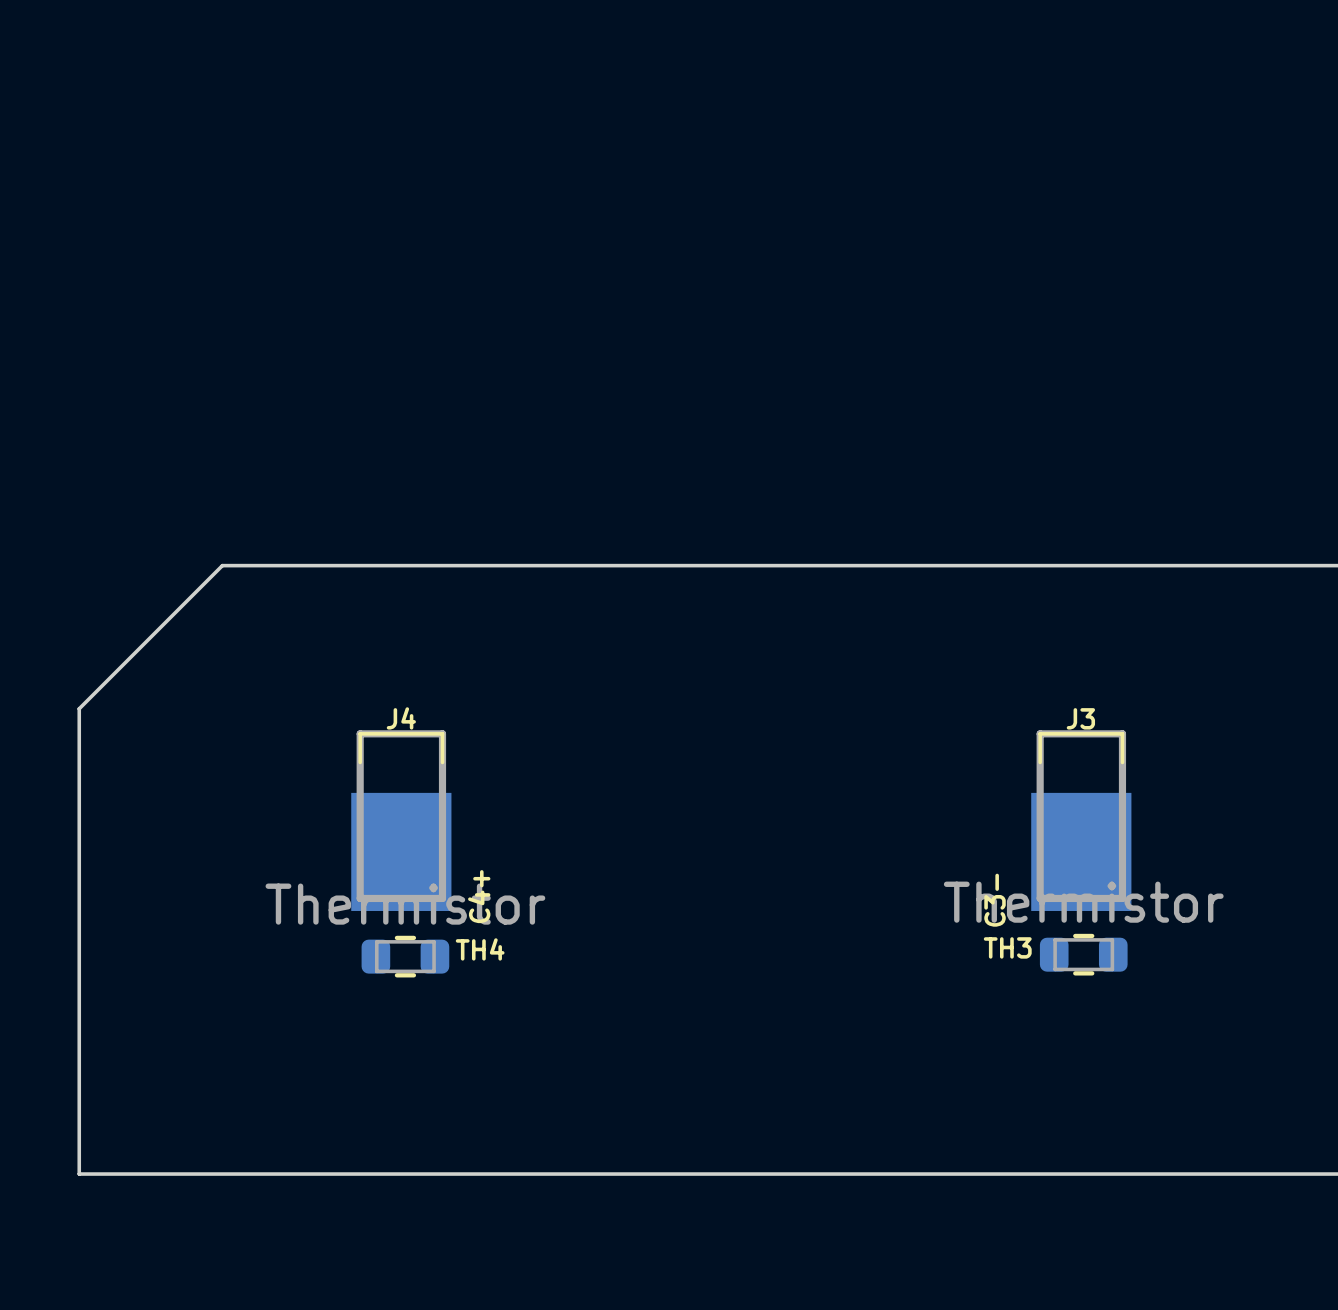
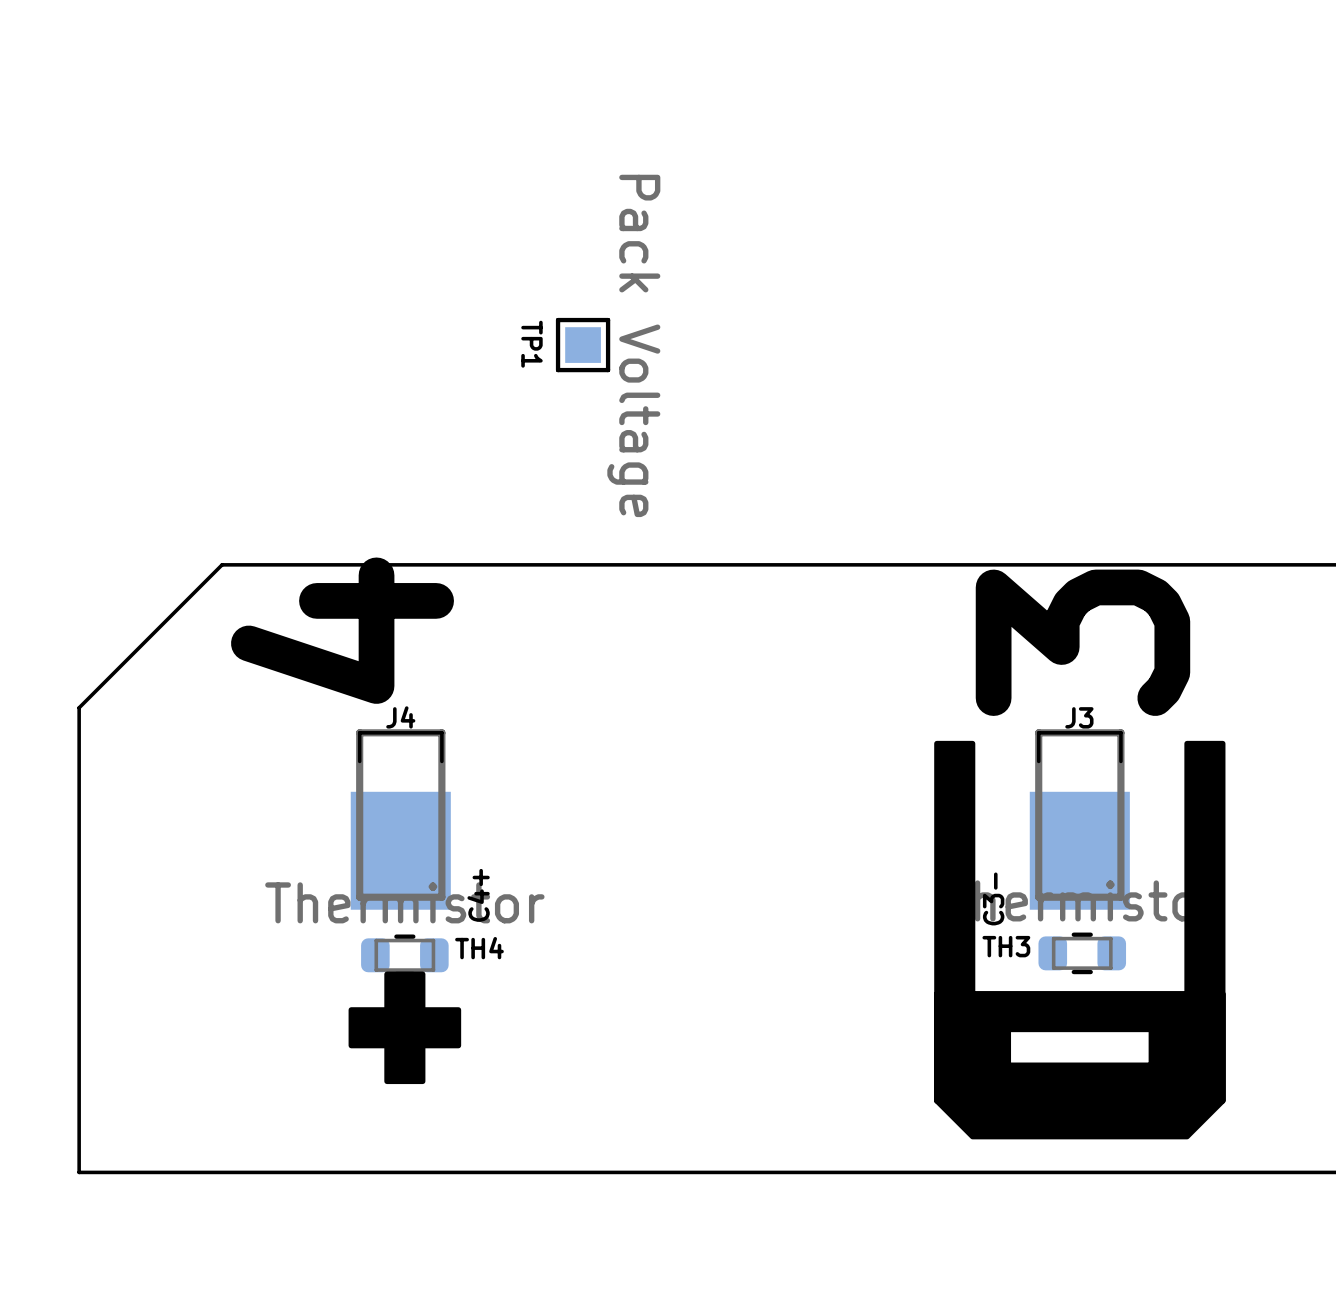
TP1: none -> Pack Voltage (583, 345)
text: none -> 4 (342, 630)
text: none -> 3 (1082, 642)
drawing: none -> [934, 740, 1226, 1140]
drawing: none -> [348, 971, 462, 1085]

